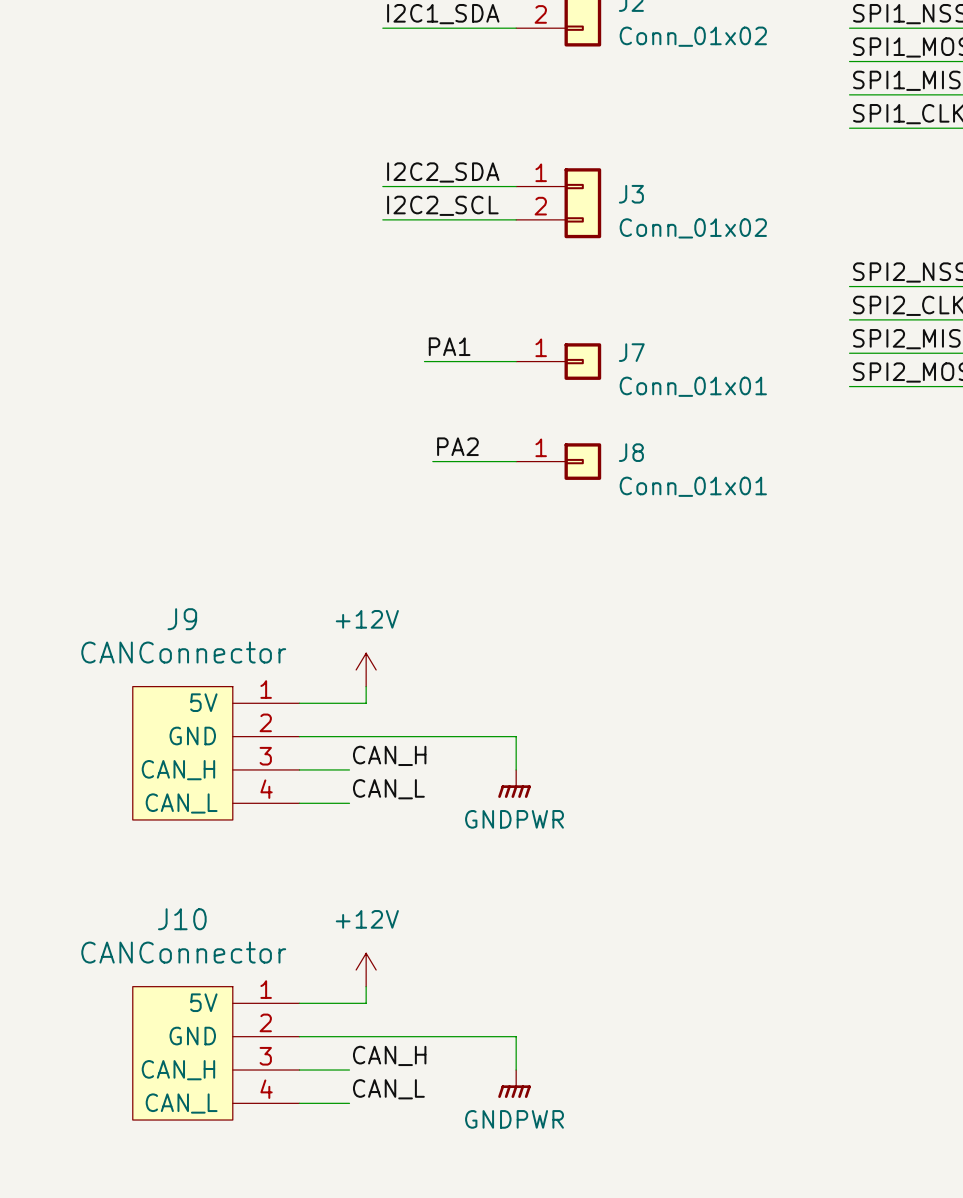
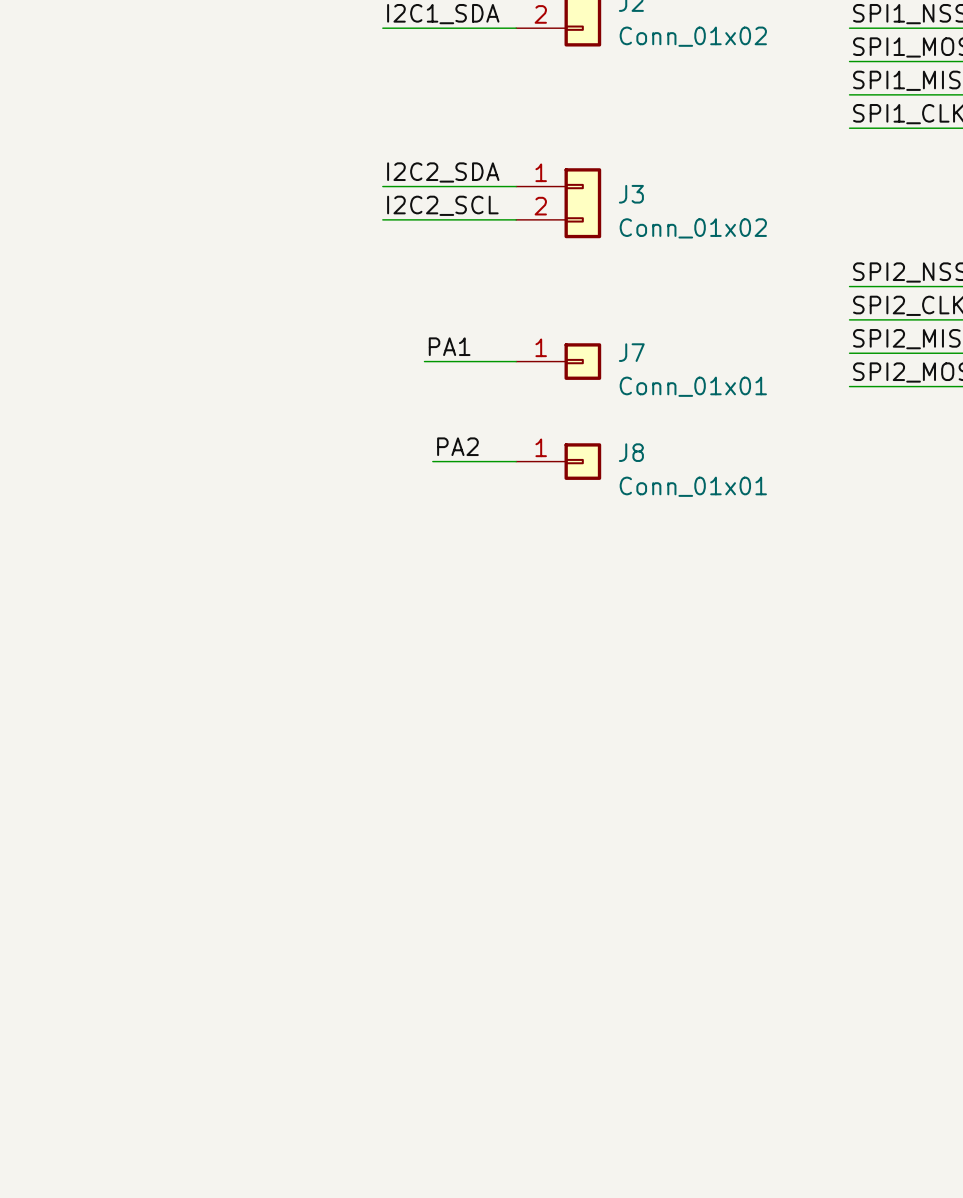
power symbol: +12V (366, 669) -> none
wire: (366, 686) (366, 703) (299, 703) -> none
wire: (299, 736) (516, 736) (516, 769) -> none
J9: CANConnector (216, 753) -> none
label: CAN_H (389, 755) -> none
wire: (299, 769) (349, 769) -> none
power symbol: GNDPWR (514, 783) -> none
label: CAN_L (388, 789) -> none
wire: (299, 803) (349, 803) -> none
power symbol: +12V (366, 969) -> none
wire: (366, 986) (366, 1003) (299, 1003) -> none
wire: (299, 1036) (516, 1036) (516, 1070) -> none
J10: CANConnector (216, 1053) -> none
label: CAN_H (389, 1055) -> none
wire: (299, 1070) (349, 1070) -> none
power symbol: GNDPWR (514, 1084) -> none
label: CAN_L (388, 1089) -> none
wire: (299, 1103) (349, 1103) -> none

